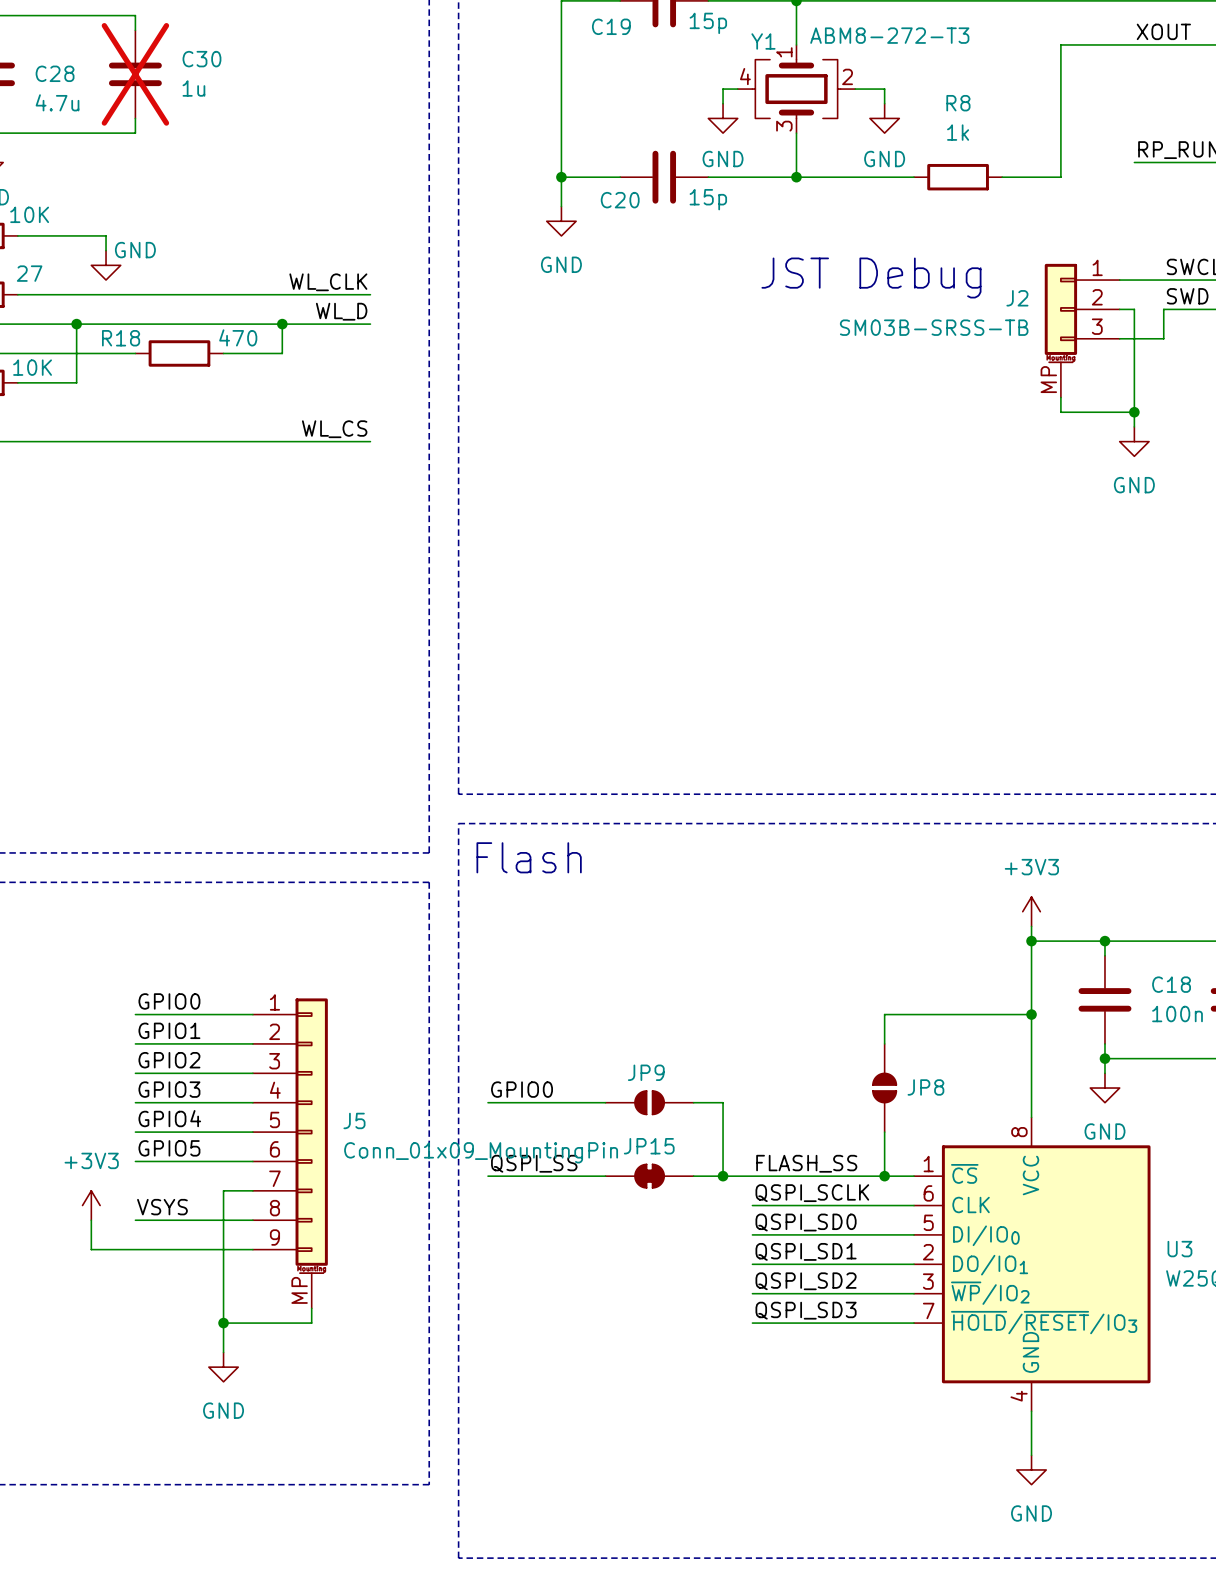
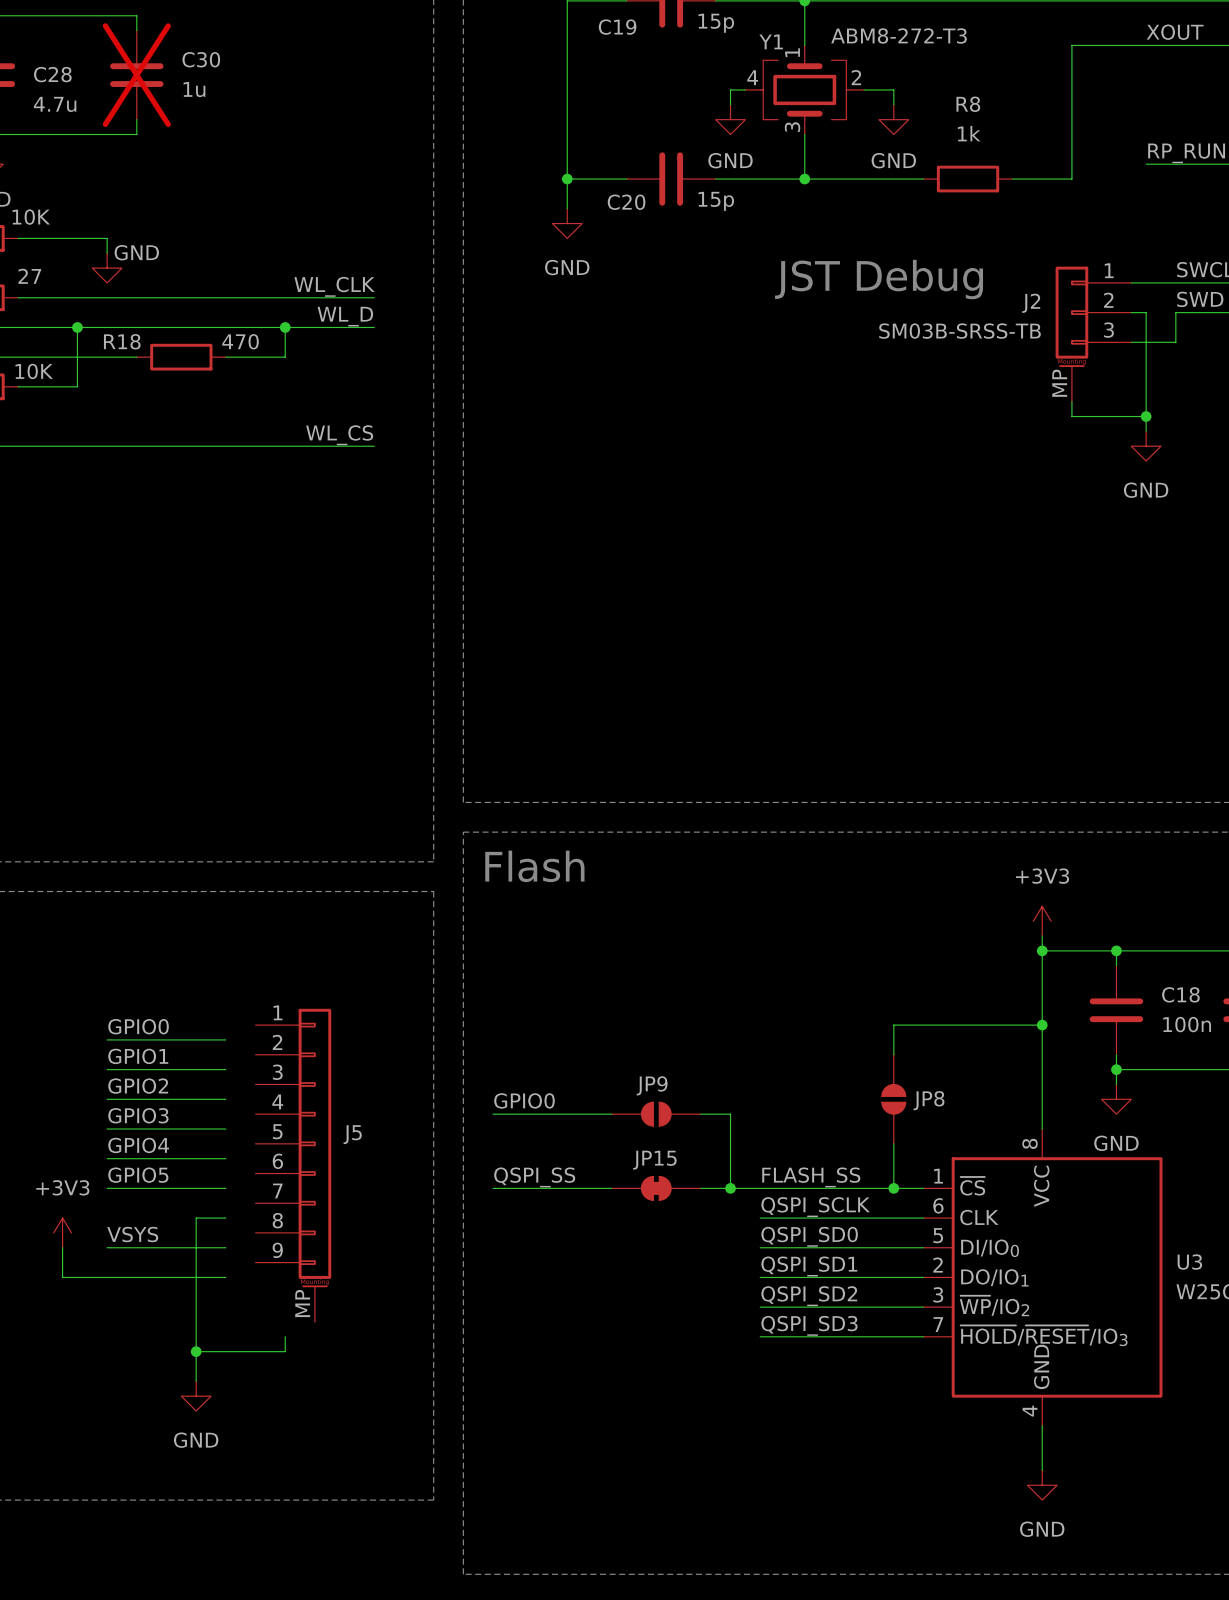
label position: GPIO0 (169, 1001) -> GPIO0 (138, 1026)
wire: (135, 1014) (252, 1014) -> (107, 1039) (225, 1039)
label position: GPIO1 (169, 1030) -> GPIO1 (138, 1056)
wire: (135, 1043) (252, 1043) -> (107, 1069) (225, 1069)
label position: GPIO2 (169, 1060) -> GPIO2 (138, 1086)
wire: (135, 1073) (252, 1073) -> (107, 1099) (225, 1099)
label position: GPIO3 (169, 1089) -> GPIO3 (138, 1115)
wire: (135, 1102) (252, 1102) -> (107, 1129) (225, 1129)
label position: GPIO4 (169, 1118) -> GPIO4 (138, 1145)
wire: (135, 1132) (252, 1132) -> (107, 1158) (225, 1158)
label position: GPIO5 (169, 1148) -> GPIO5 (138, 1175)
J5 value: Conn_01x09_MountingPin (481, 1152) -> none
wire: (135, 1161) (252, 1161) -> (107, 1188) (225, 1188)
wire: (252, 1190) (223, 1190) (223, 1352) -> (225, 1218) (196, 1218) (196, 1381)
power symbol position: +3V3 (91, 1205) -> +3V3 (62, 1232)
label position: VSYS (162, 1207) -> VSYS (132, 1234)
wire: (91, 1220) (91, 1249) (252, 1249) -> (62, 1247) (62, 1277) (225, 1277)
wire: (135, 1220) (252, 1220) -> (107, 1247) (225, 1247)
wire: (311, 1308) (311, 1323) (223, 1323) -> (285, 1336) (285, 1351) (196, 1351)
junction position: (223, 1323) -> (196, 1351)
power symbol position: GND (223, 1367) -> GND (196, 1396)

